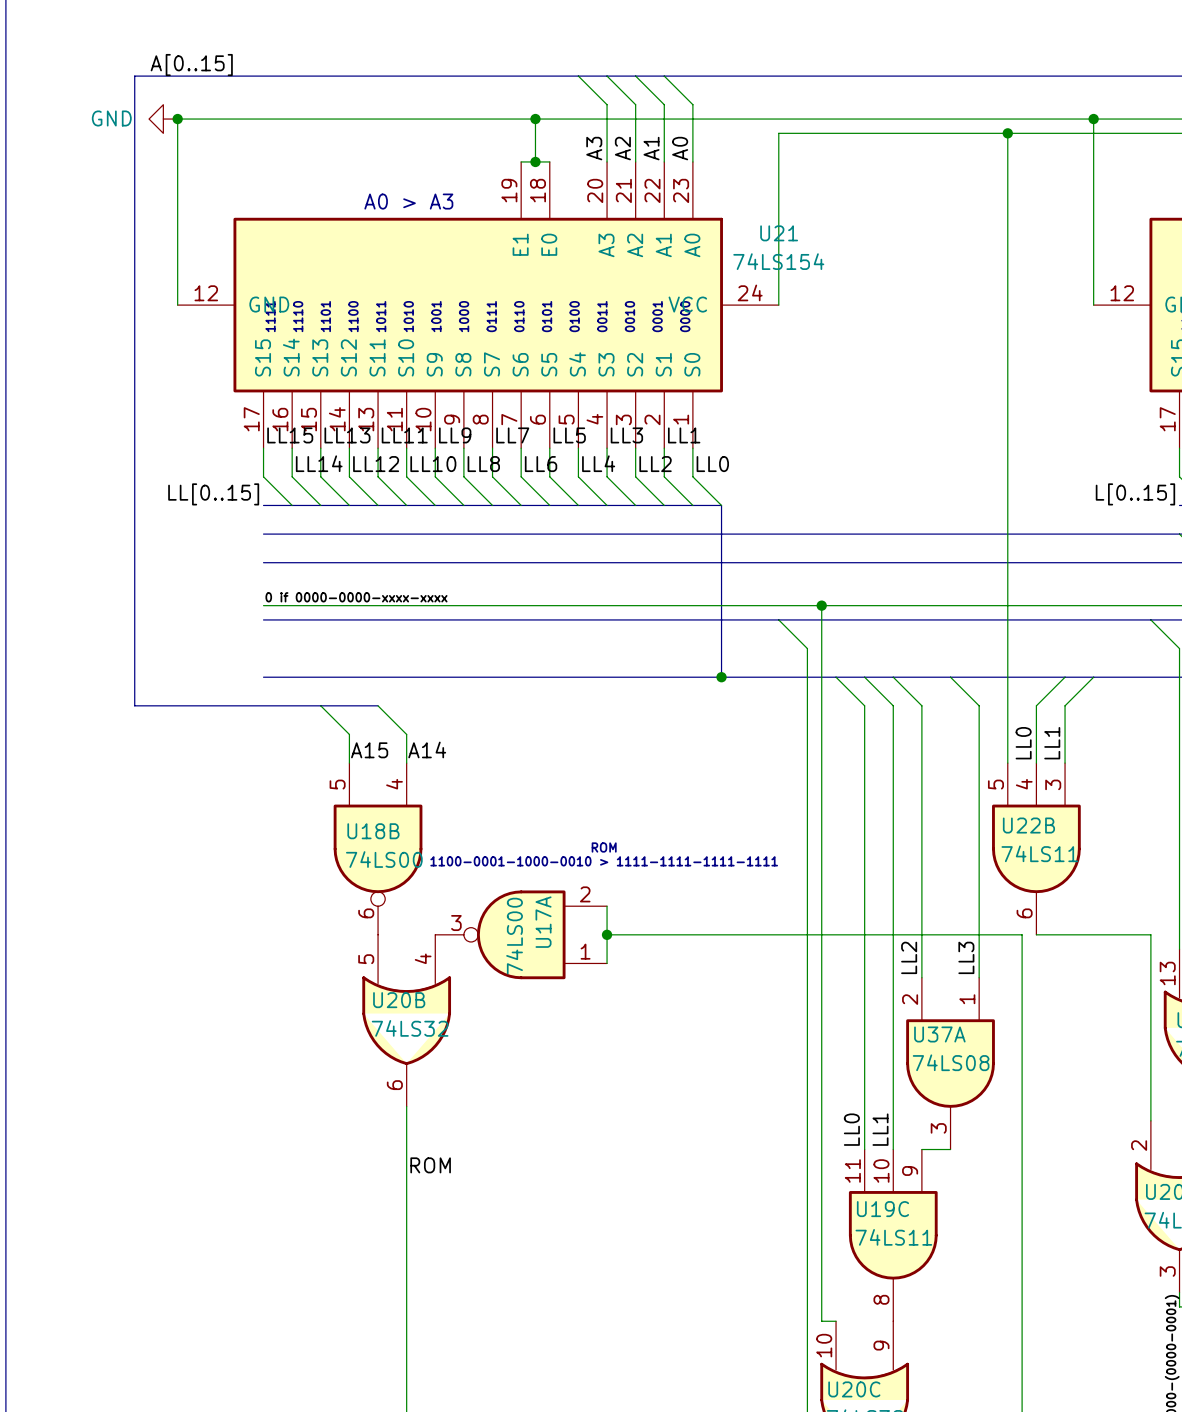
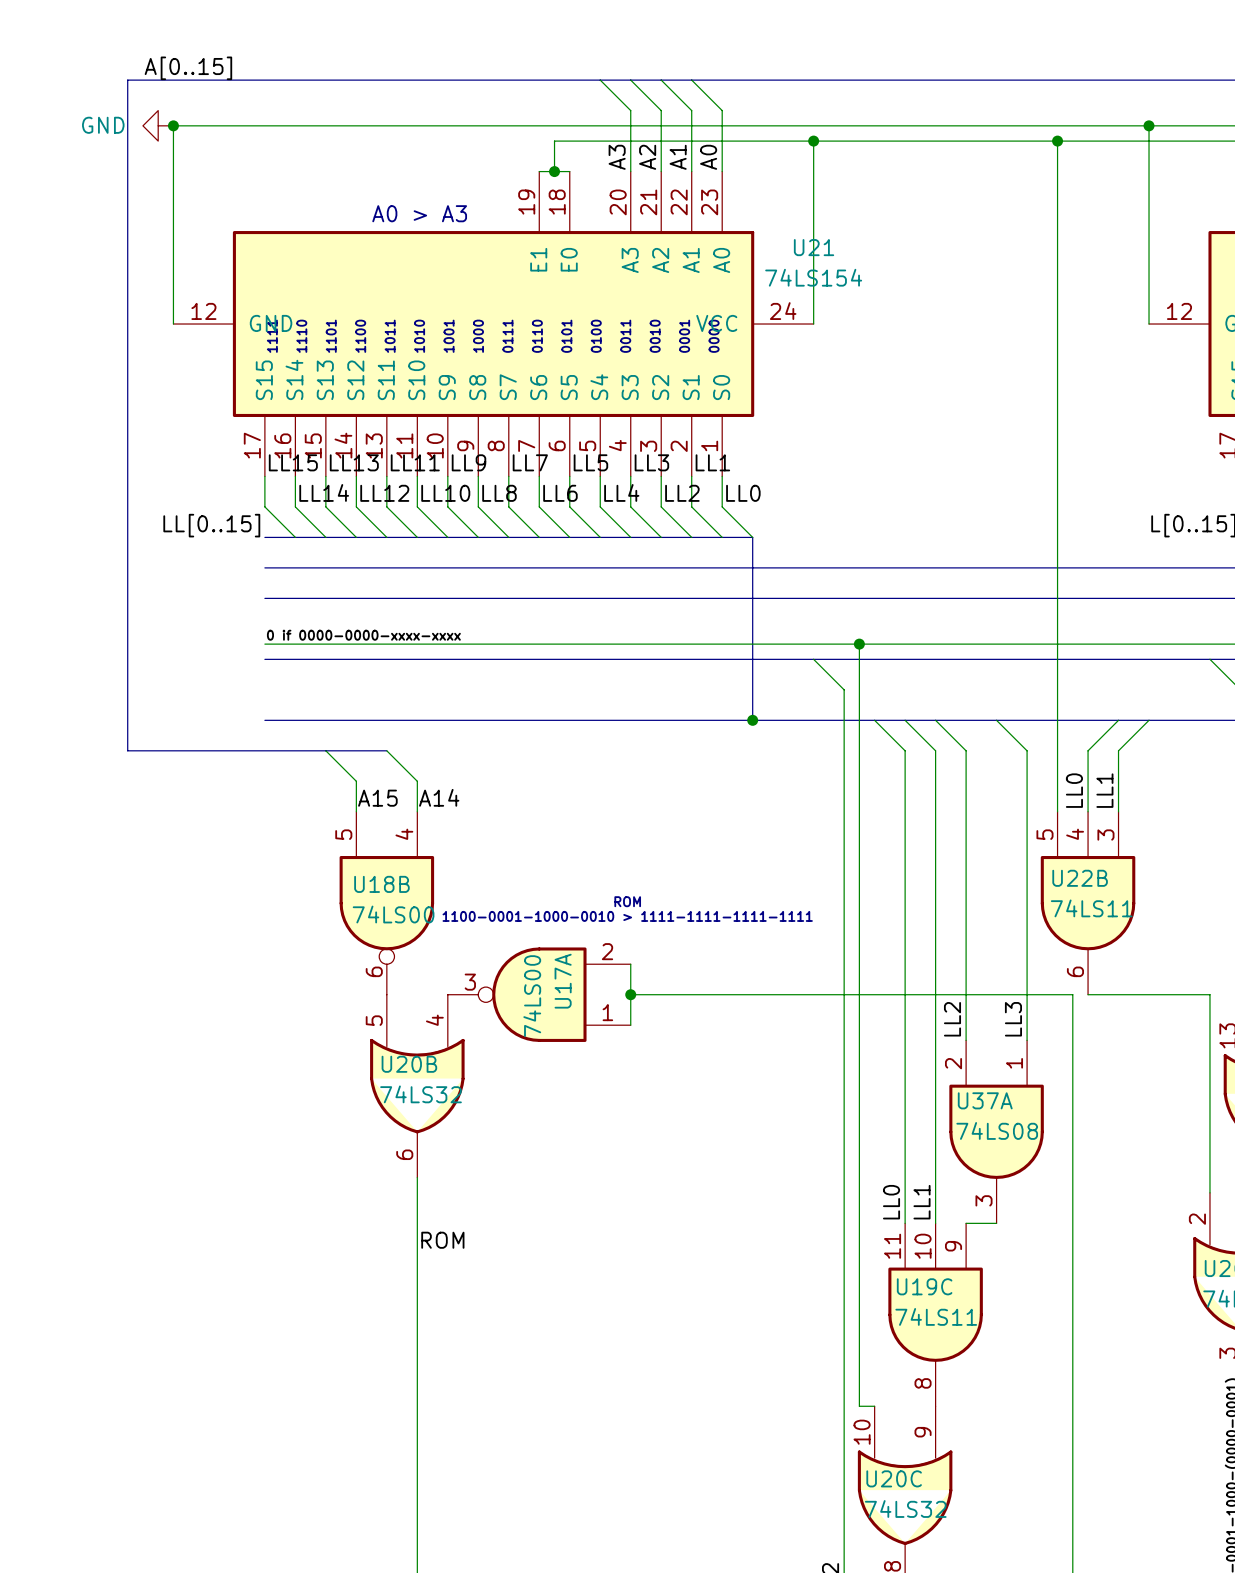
wire: (535, 119) (535, 133) -> (813, 141) (554, 141)
junction: (535, 119) -> none
junction: none -> (813, 141)

